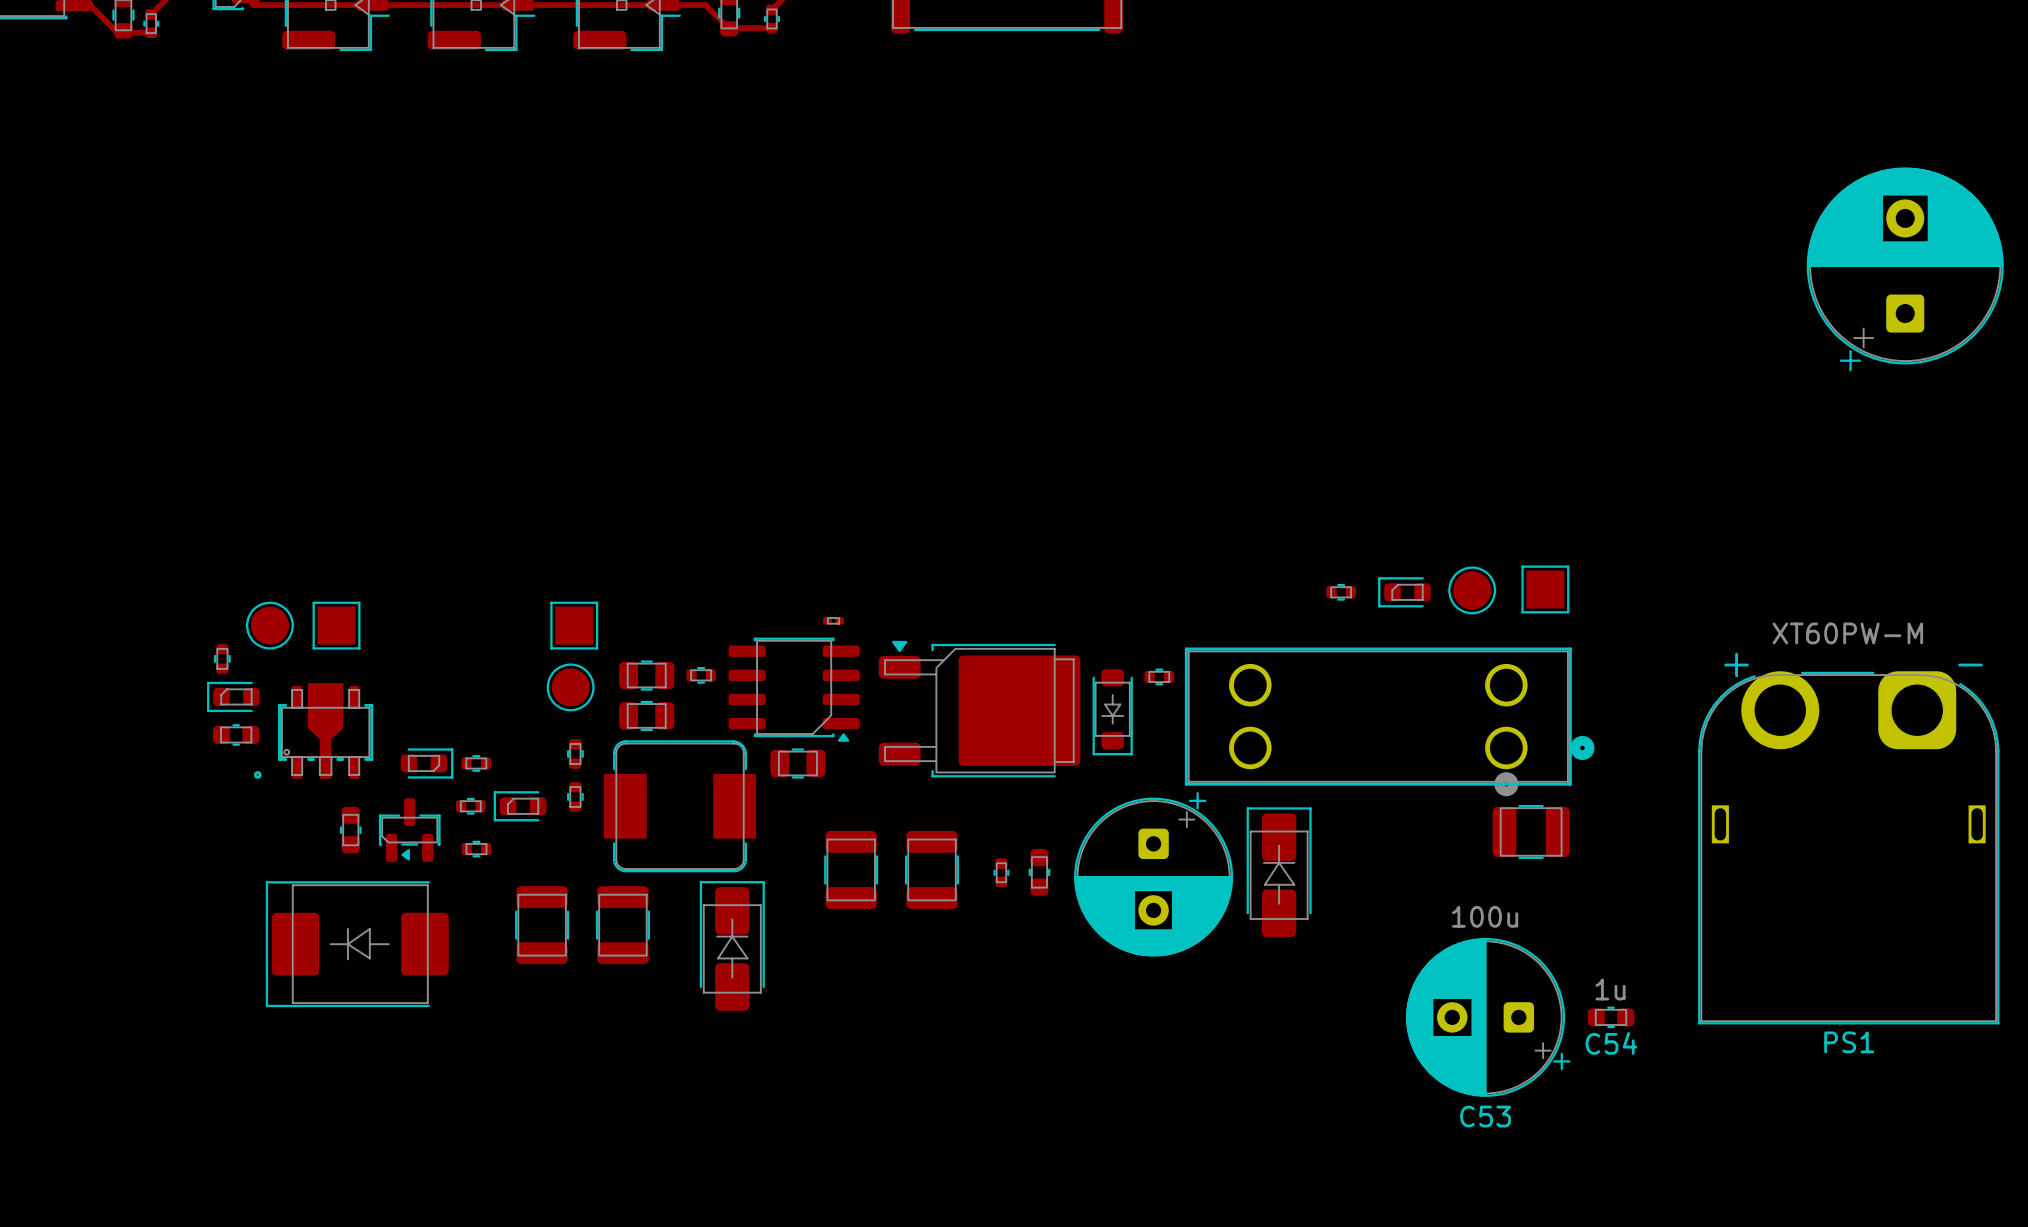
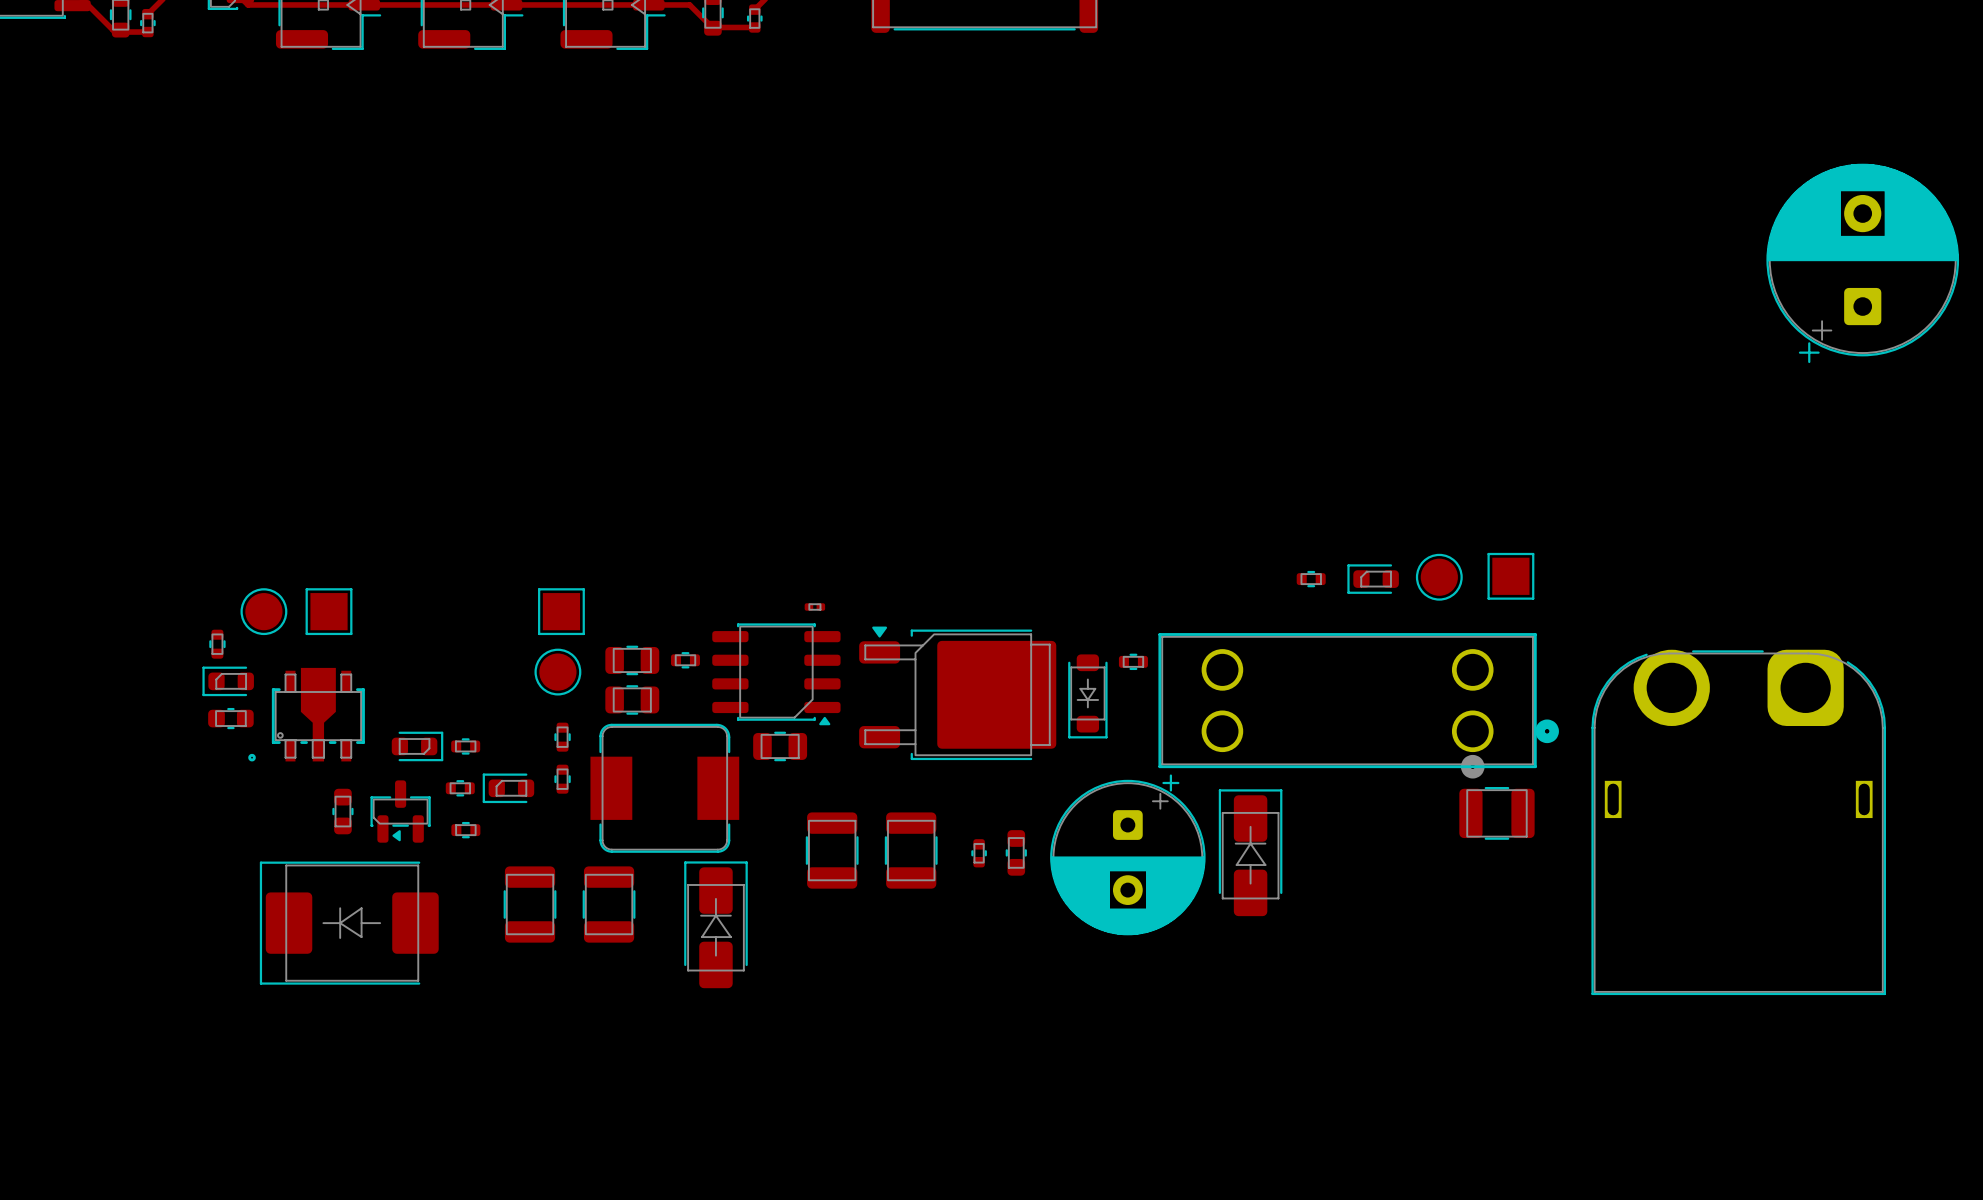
part: none -> (1738, 822)
PS1: XT60PW-M (1848, 847) -> none
C53: 100u (1488, 1017) -> none
C54: 1u (1611, 1017) -> none

